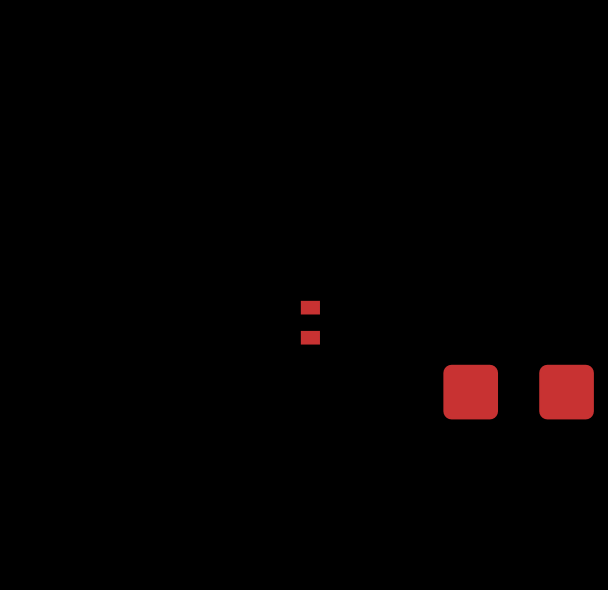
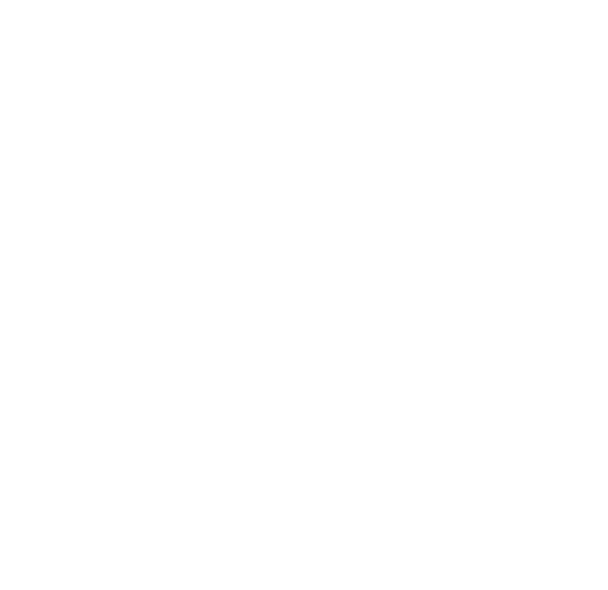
part: (310, 322) -> none
part: (518, 392) -> none

